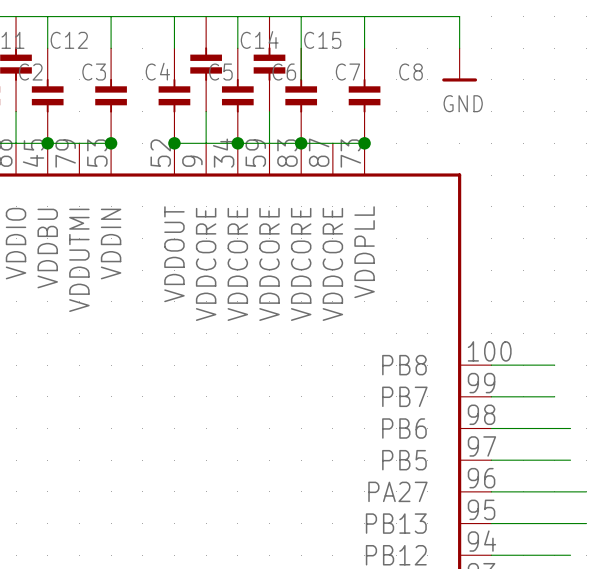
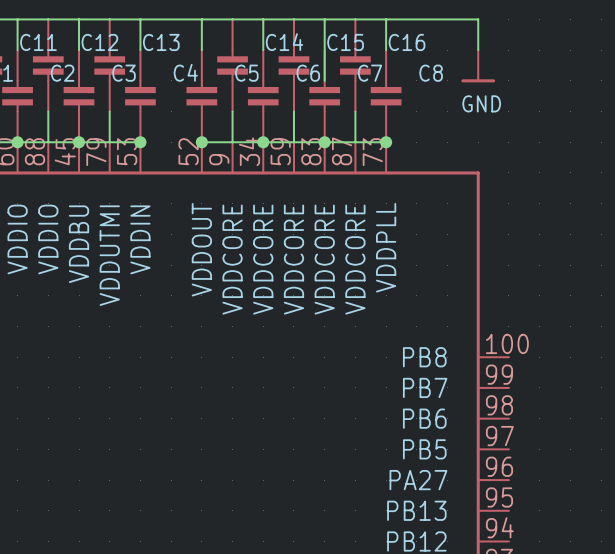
C13: none -> (109, 65)
C16: none -> (355, 65)
wire: none -> (109, 111) (109, 142)
wire: none -> (355, 111) (355, 142)
wire: (491, 365) (554, 365) -> none
wire: (491, 396) (554, 396) -> none
wire: (491, 428) (570, 428) -> none
wire: (491, 460) (570, 460) -> none
wire: (491, 491) (586, 491) -> none
wire: (491, 523) (586, 523) -> none
wire: (491, 555) (570, 555) -> none

